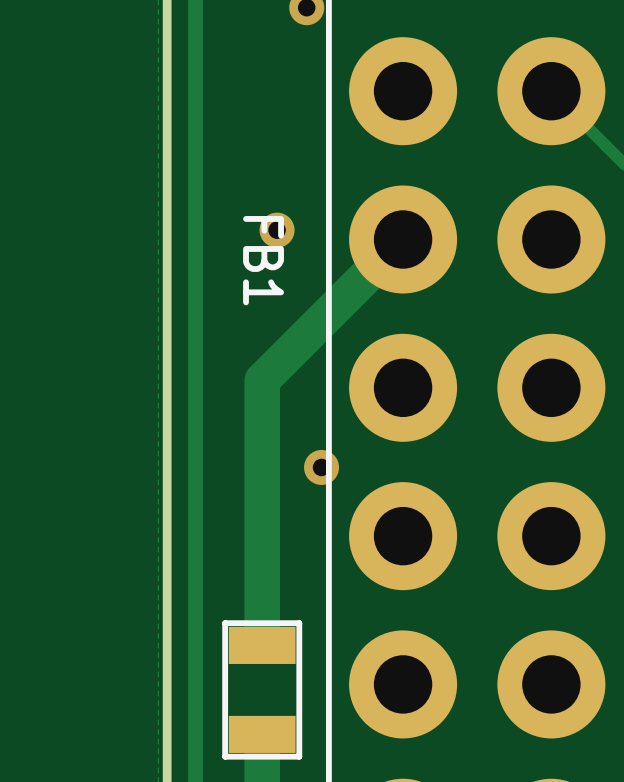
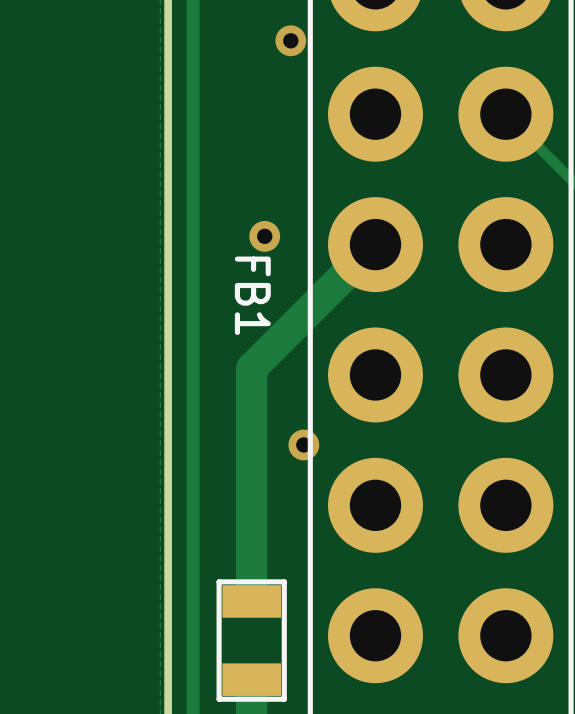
FB1 name position: FB1 (263, 260) -> FB1 (252, 295)

